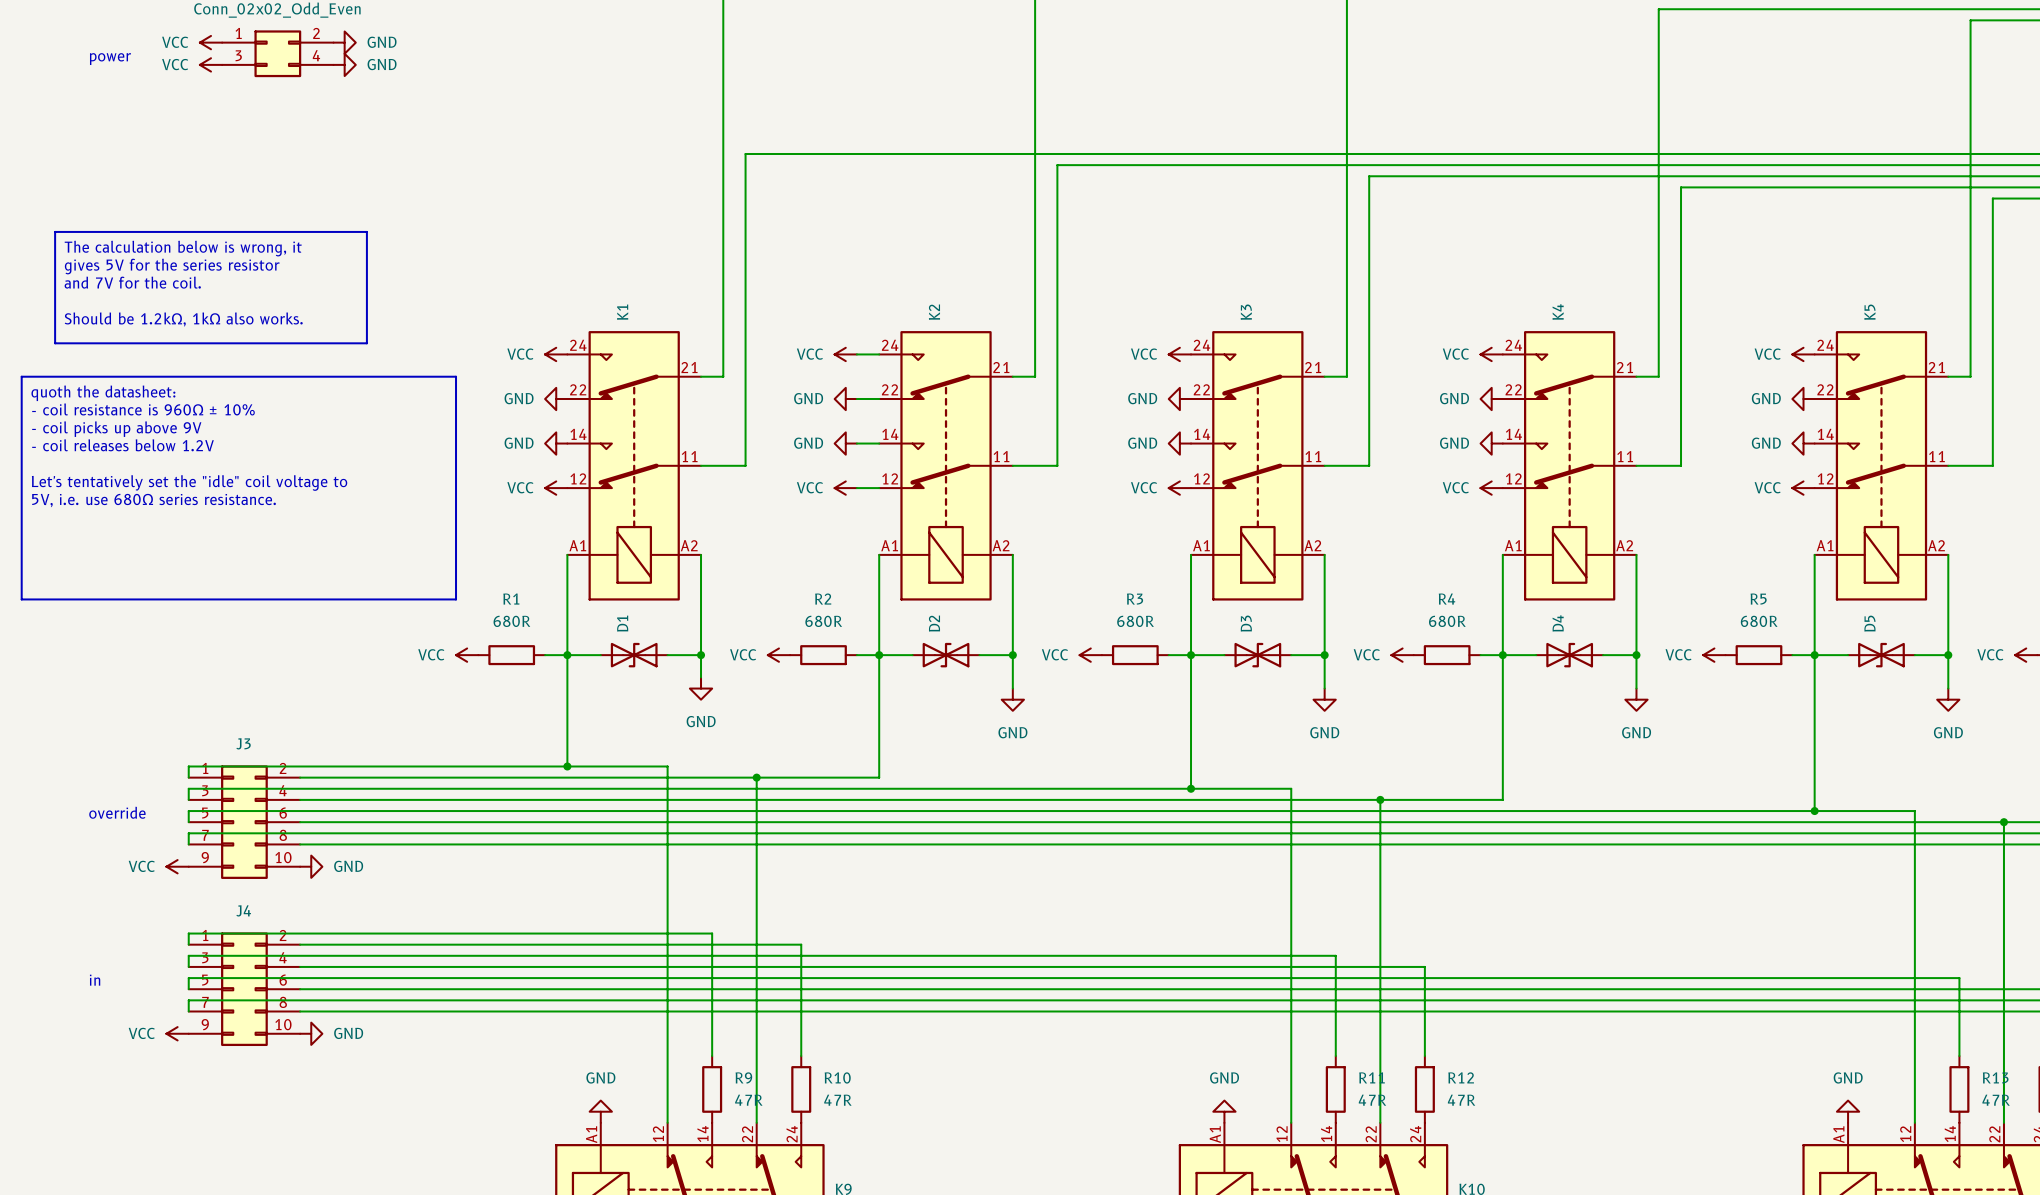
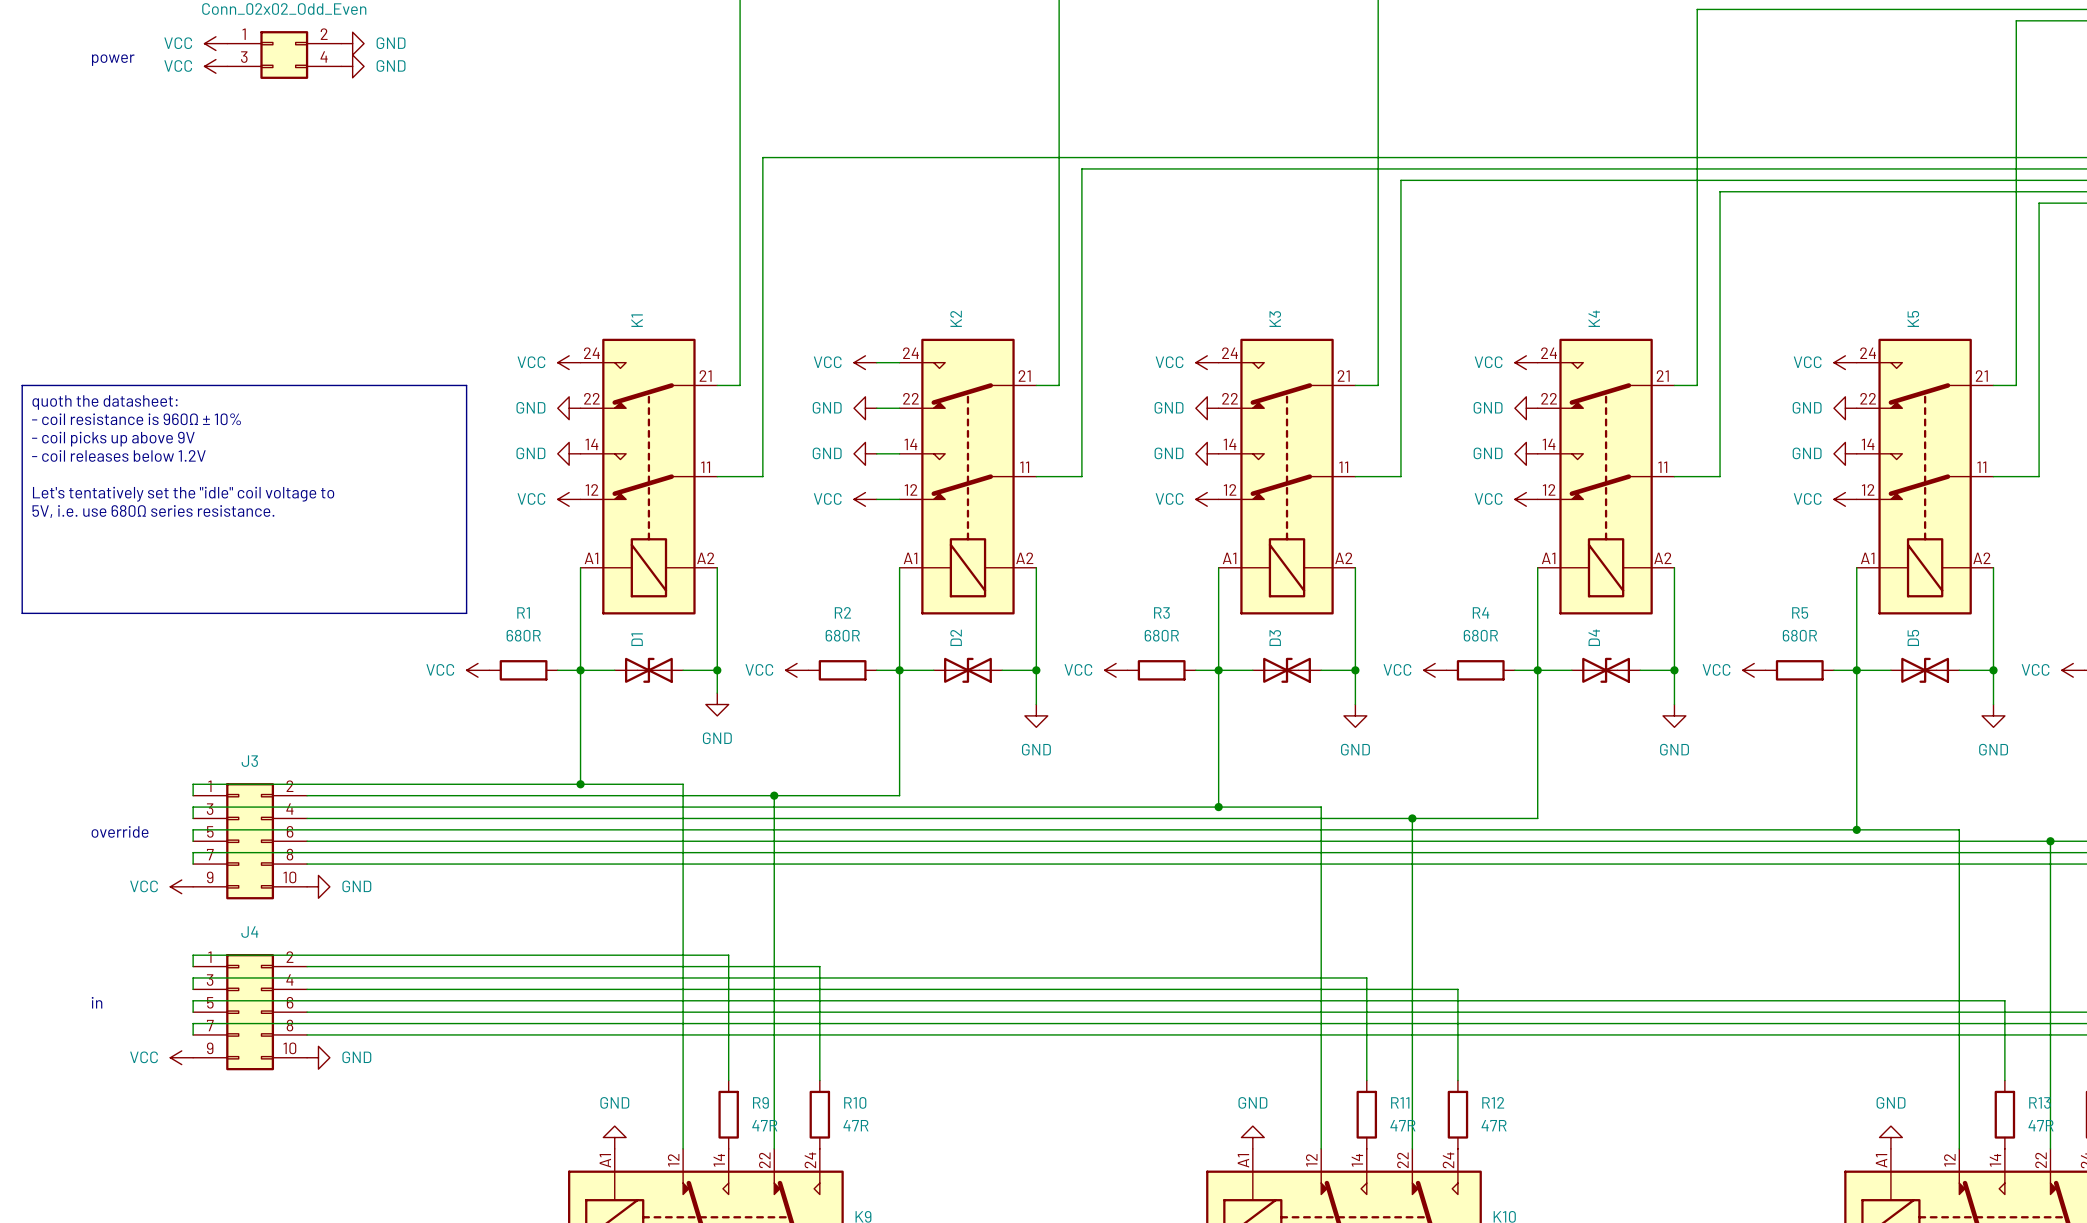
line: (55, 231) (366, 231) (366, 343) (55, 343) (55, 231) -> none
text: The calculation below is wrong, it (183, 248) -> none
text: gives 5V for the series resistor (172, 266) -> none
text: and 7V for the coil. (132, 282) -> none
text: Should be 1.2kΩ, 1kΩ also works. (183, 319) -> none

